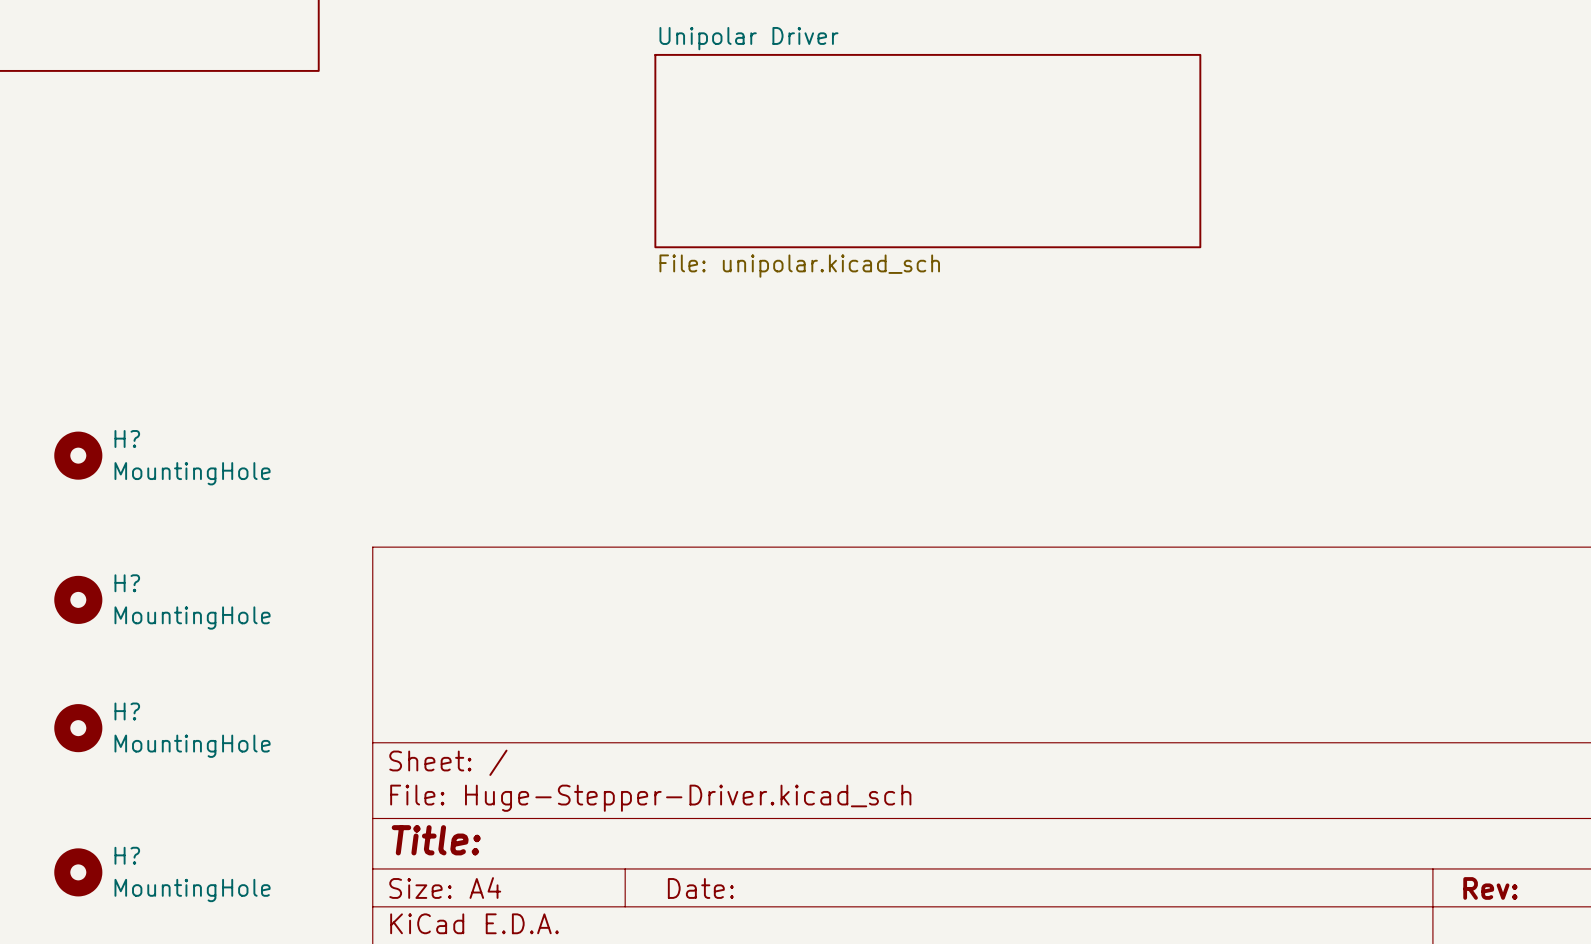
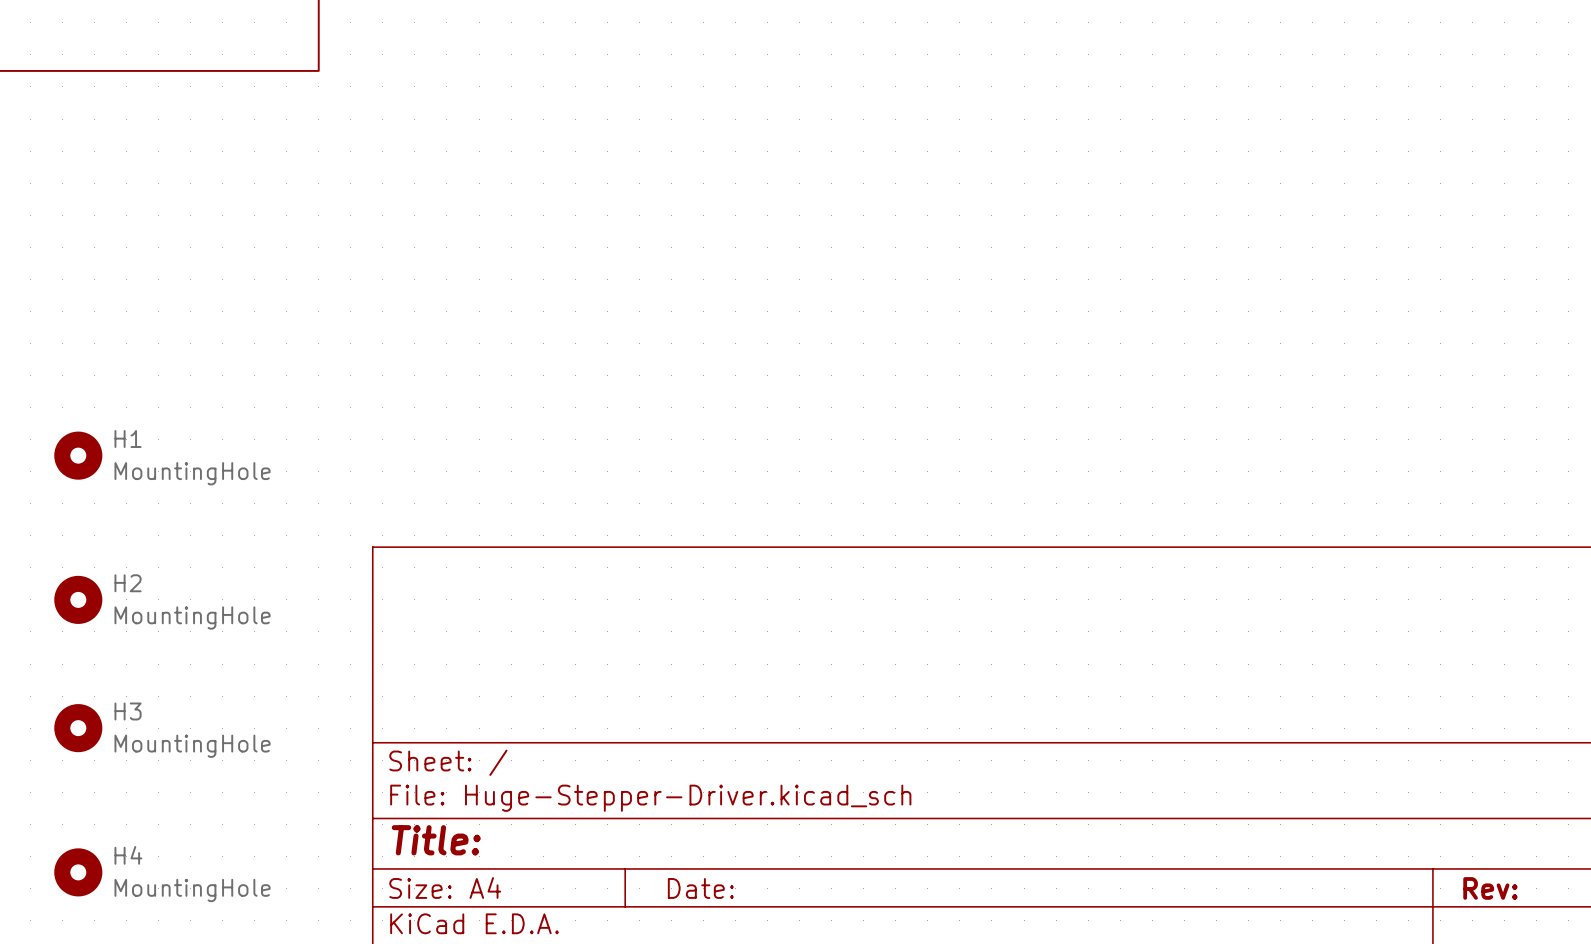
sheet Unipolar Driver: File: unipolar.kicad_sch (927, 151) -> none
H? name: H? (127, 439) -> H1 (128, 439)
H? name: H? (127, 583) -> H2 (128, 583)
H? name: H? (127, 711) -> H3 (128, 711)
H? name: H? (127, 855) -> H4 (128, 855)

